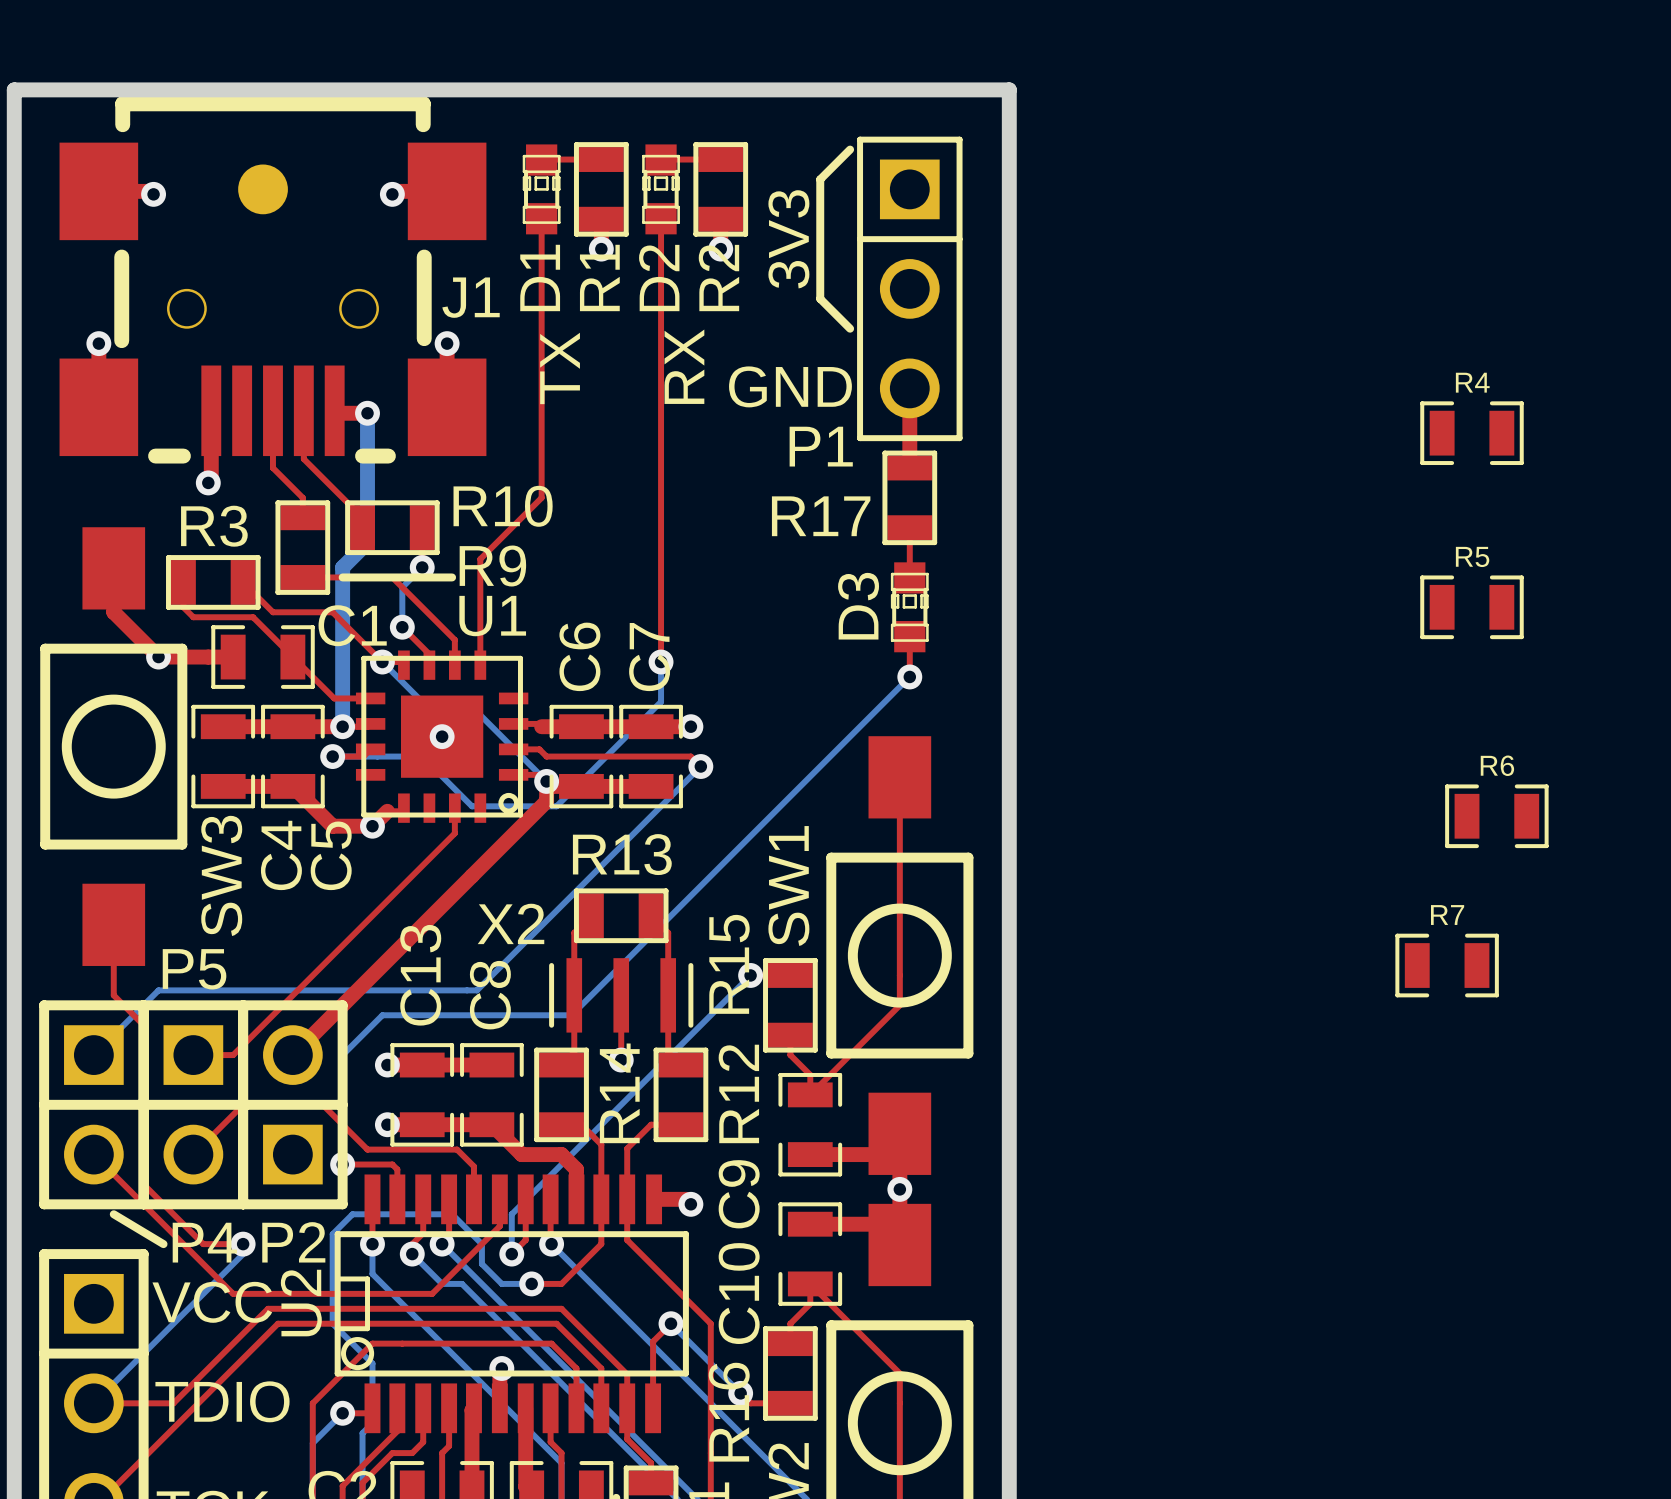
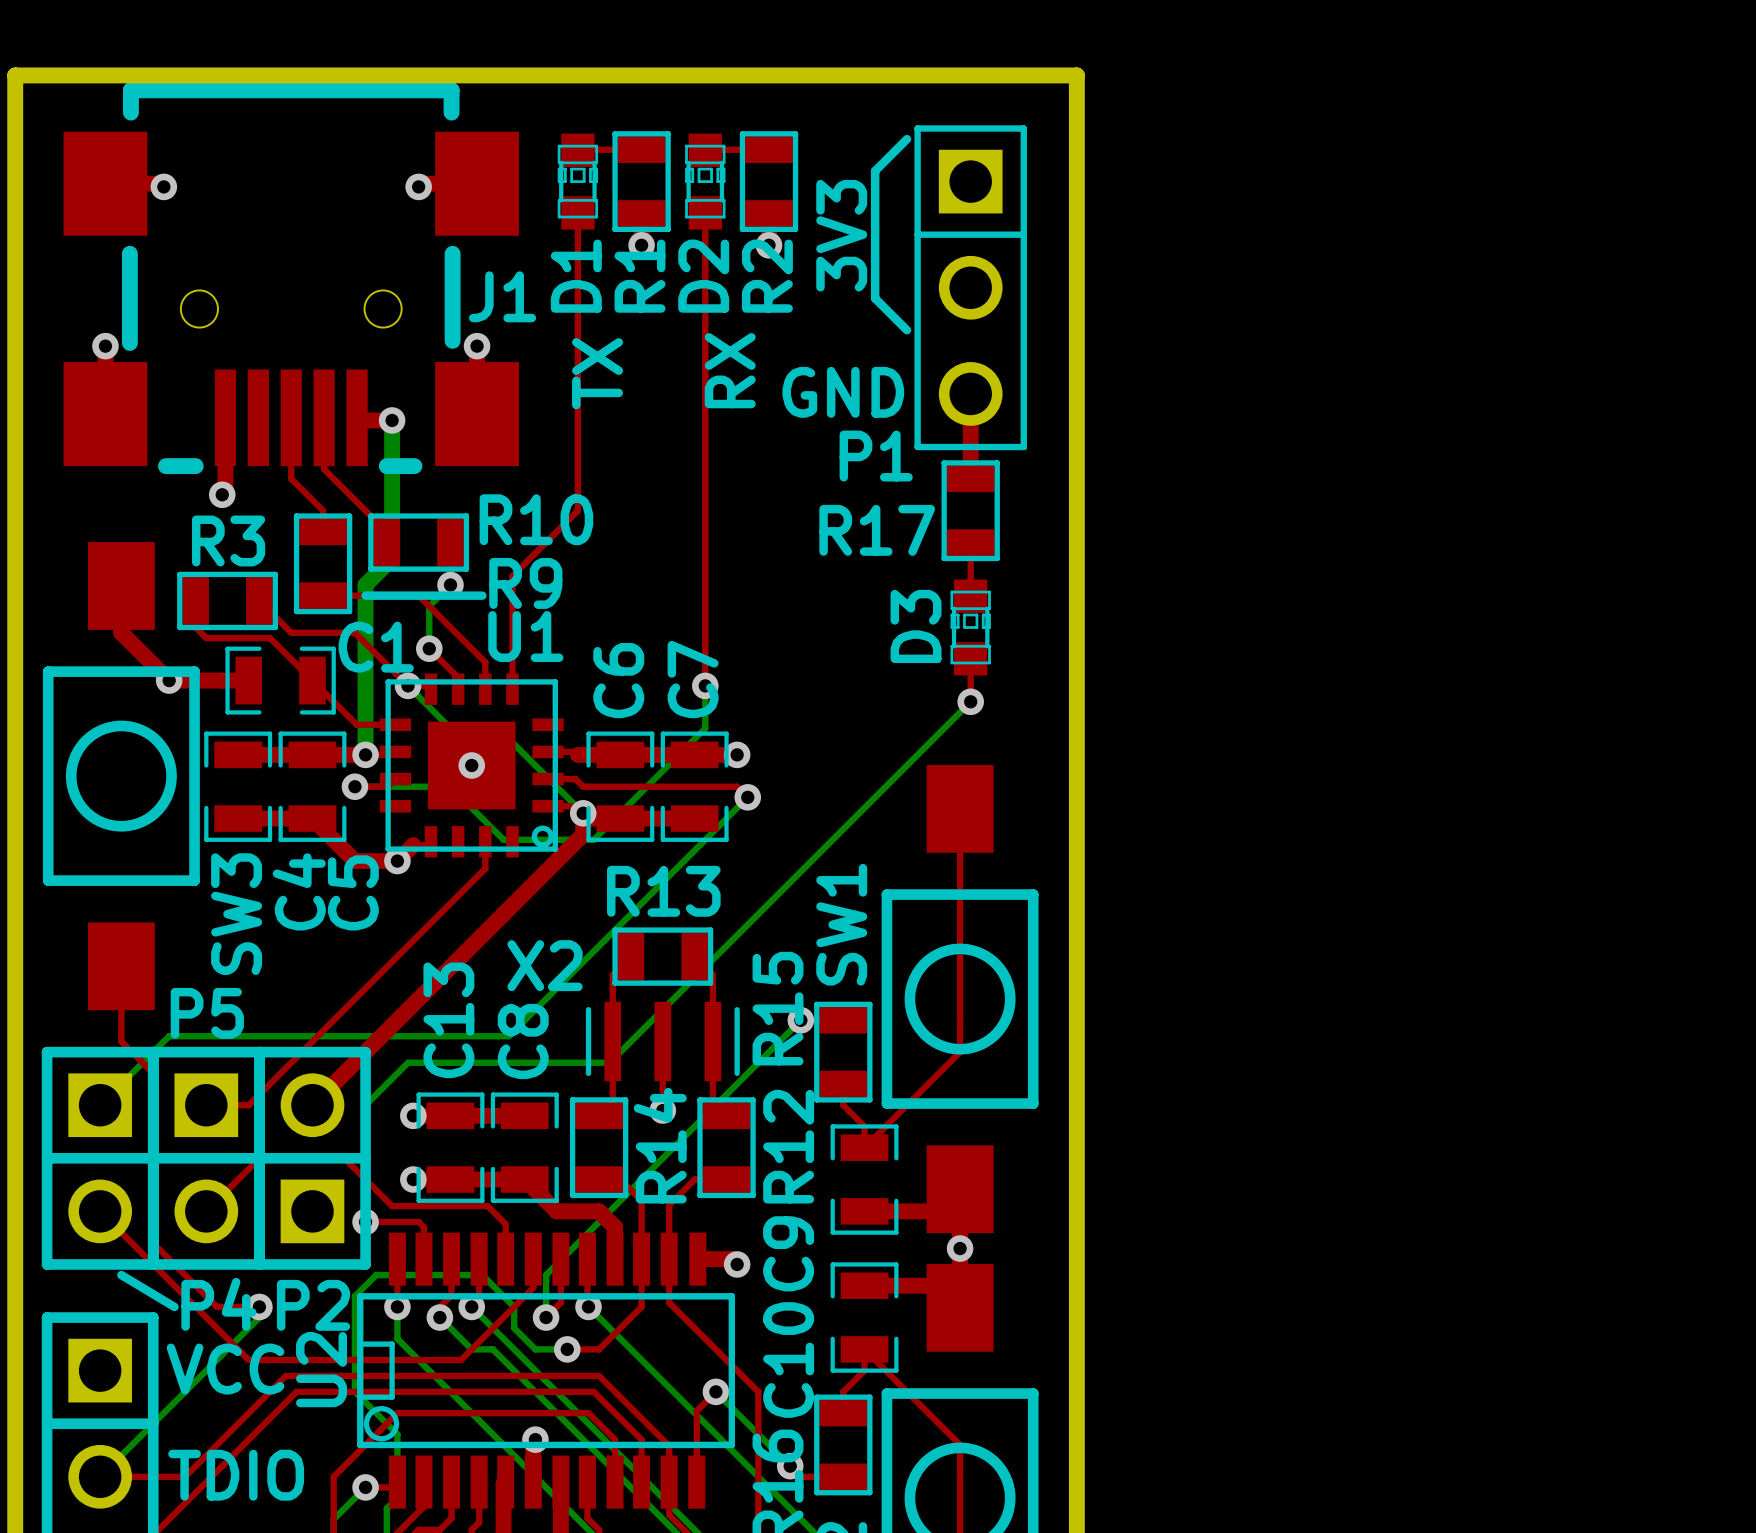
J1 footprint: [59, 96, 487, 464] -> [63, 82, 519, 475]
part: (263, 189) -> none
R4: (1471, 433) -> none
R5: (1471, 607) -> none
R6: (1496, 816) -> none
R7: (1447, 965) -> none

